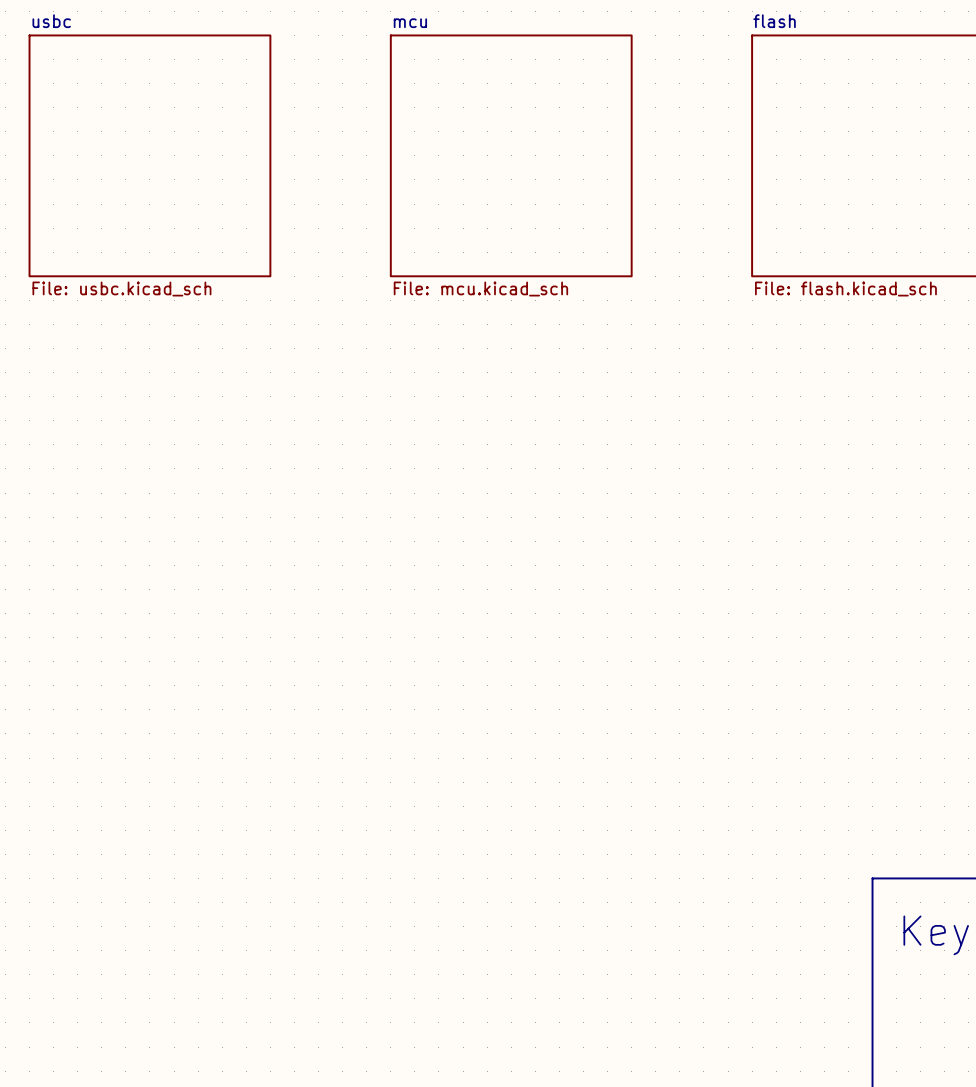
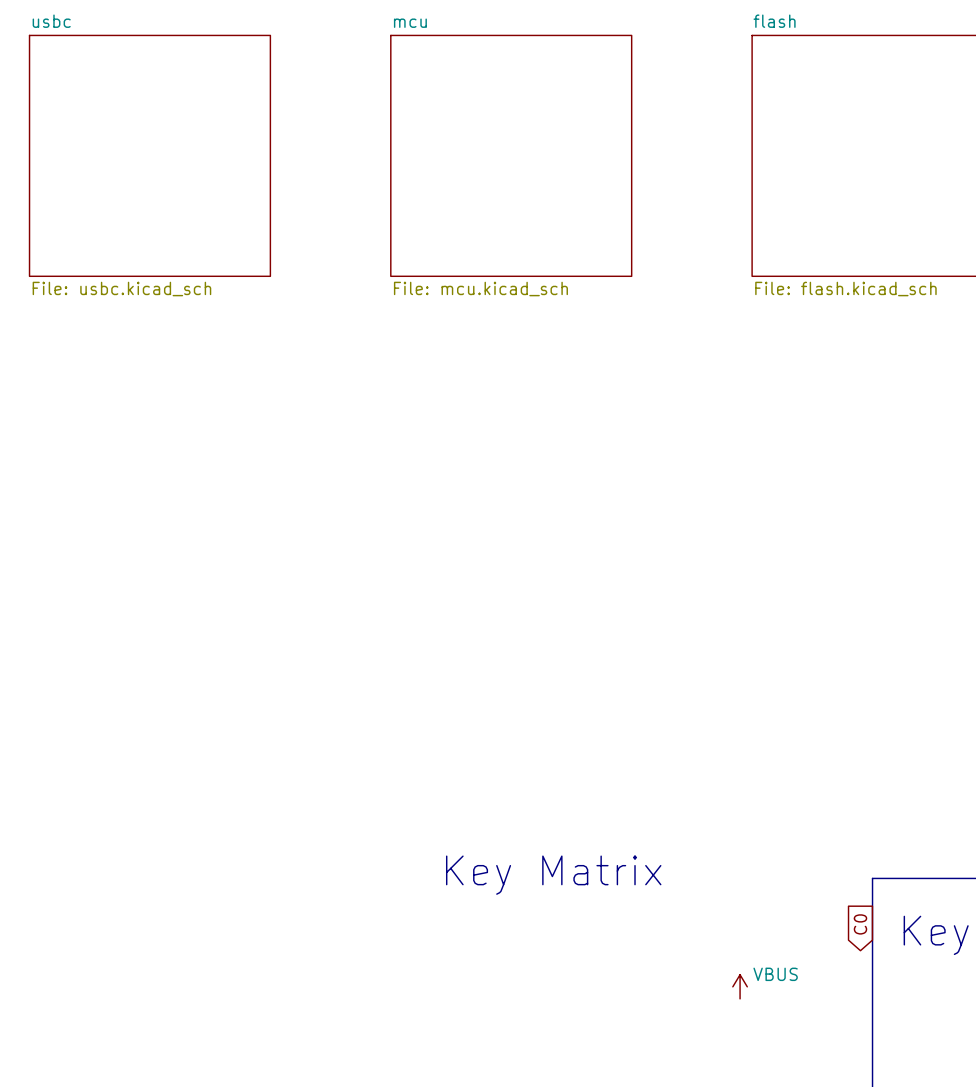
text: none -> Key Matrix (553, 875)
global label: none -> C0 (860, 924)
power symbol: none -> VBUS (740, 986)

